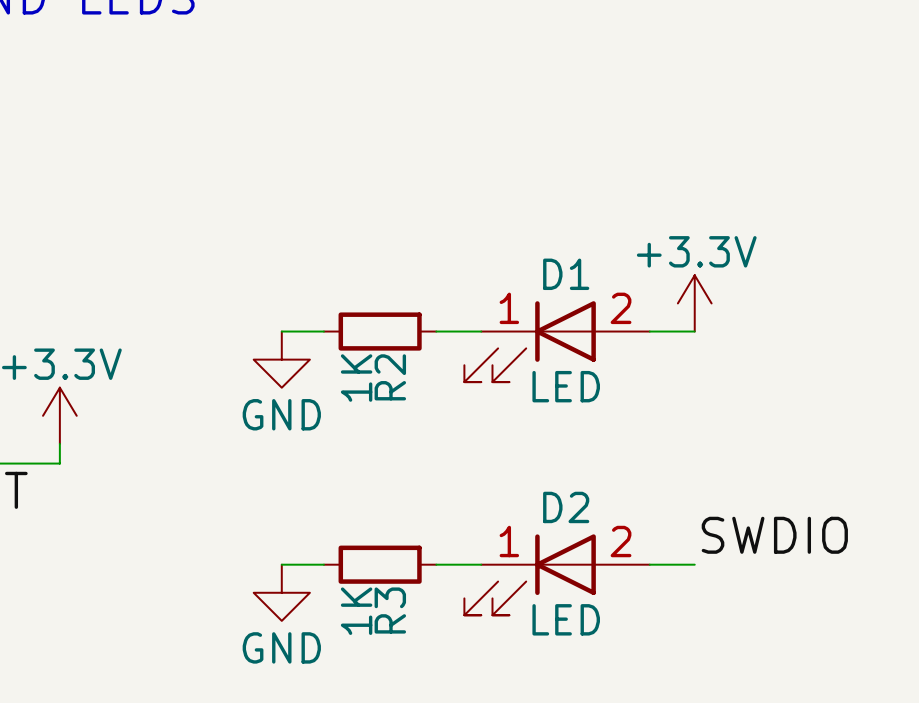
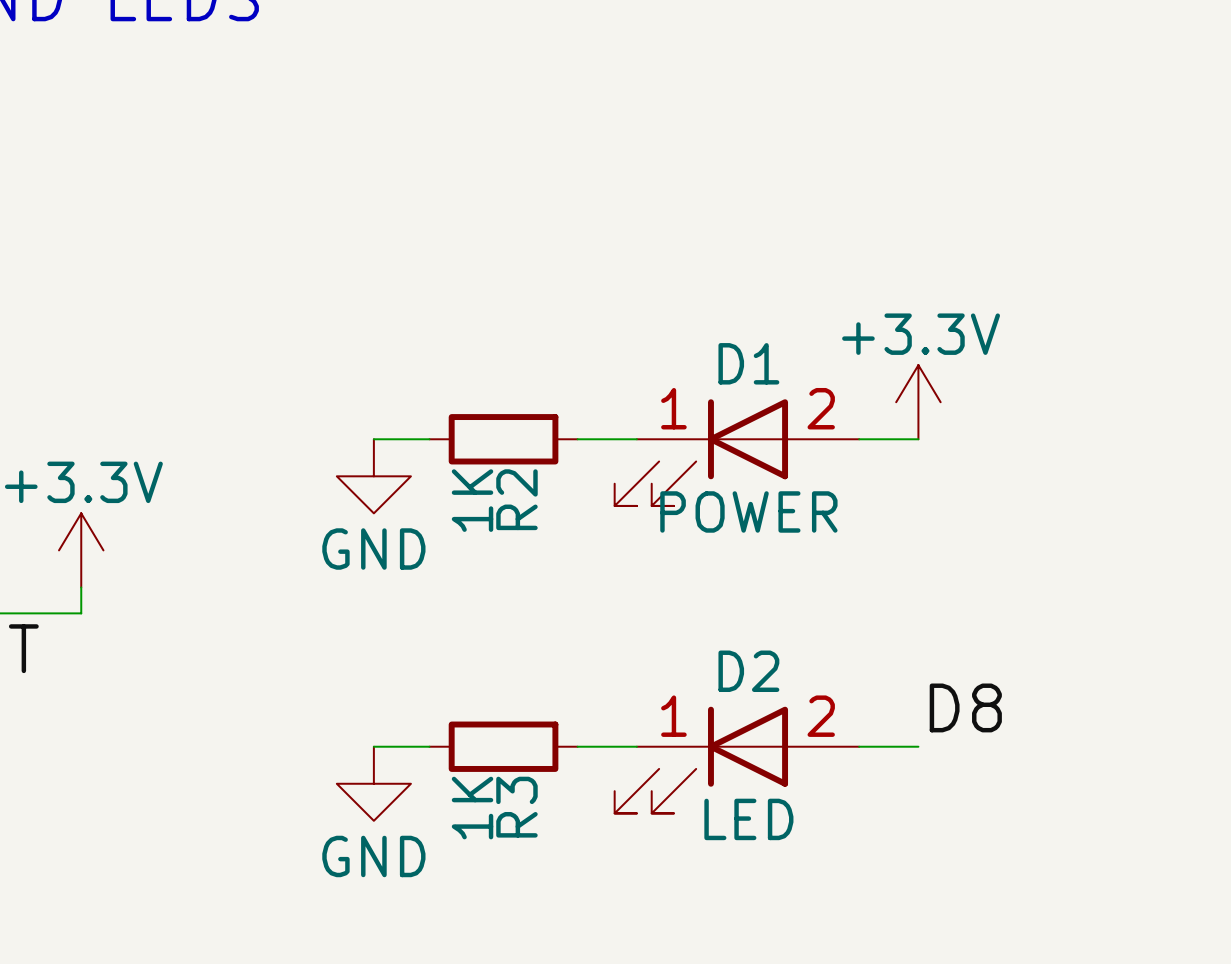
D1 value: LED (566, 386) -> POWER (748, 511)
label: SWDIO (774, 535) -> D8 (965, 707)

